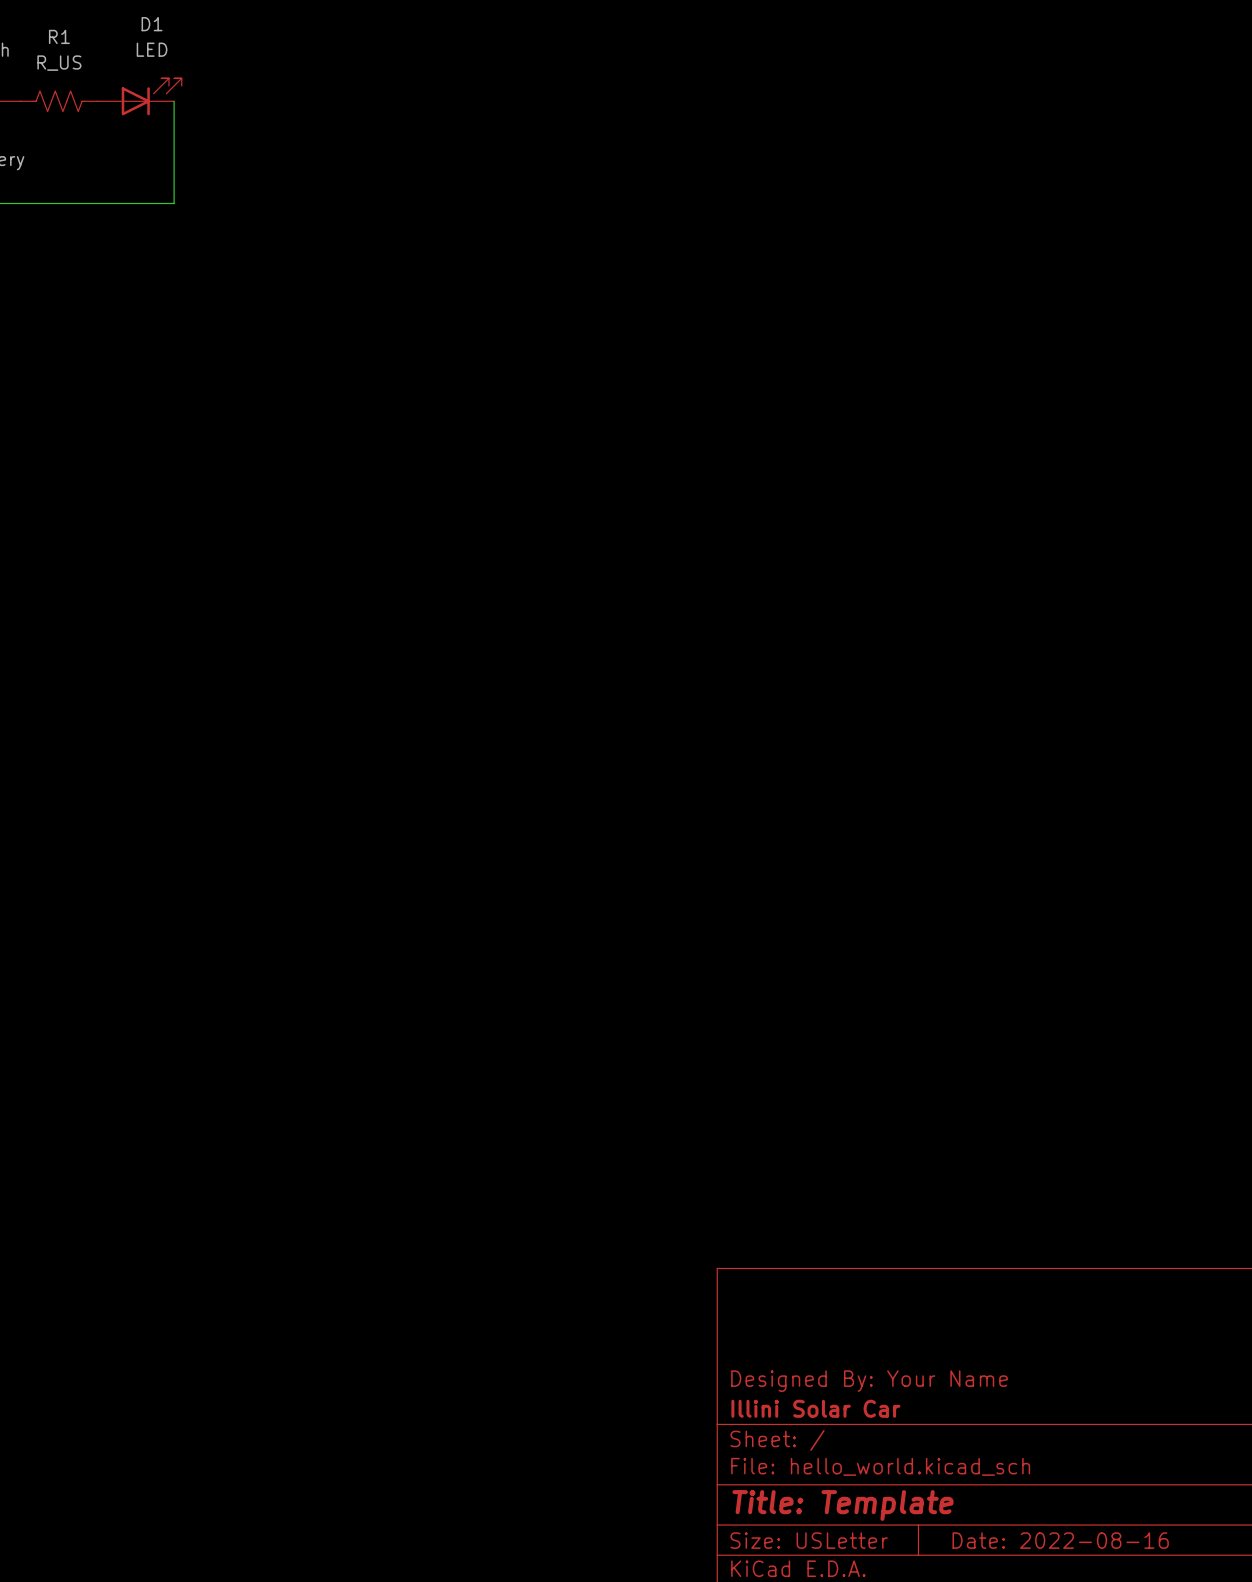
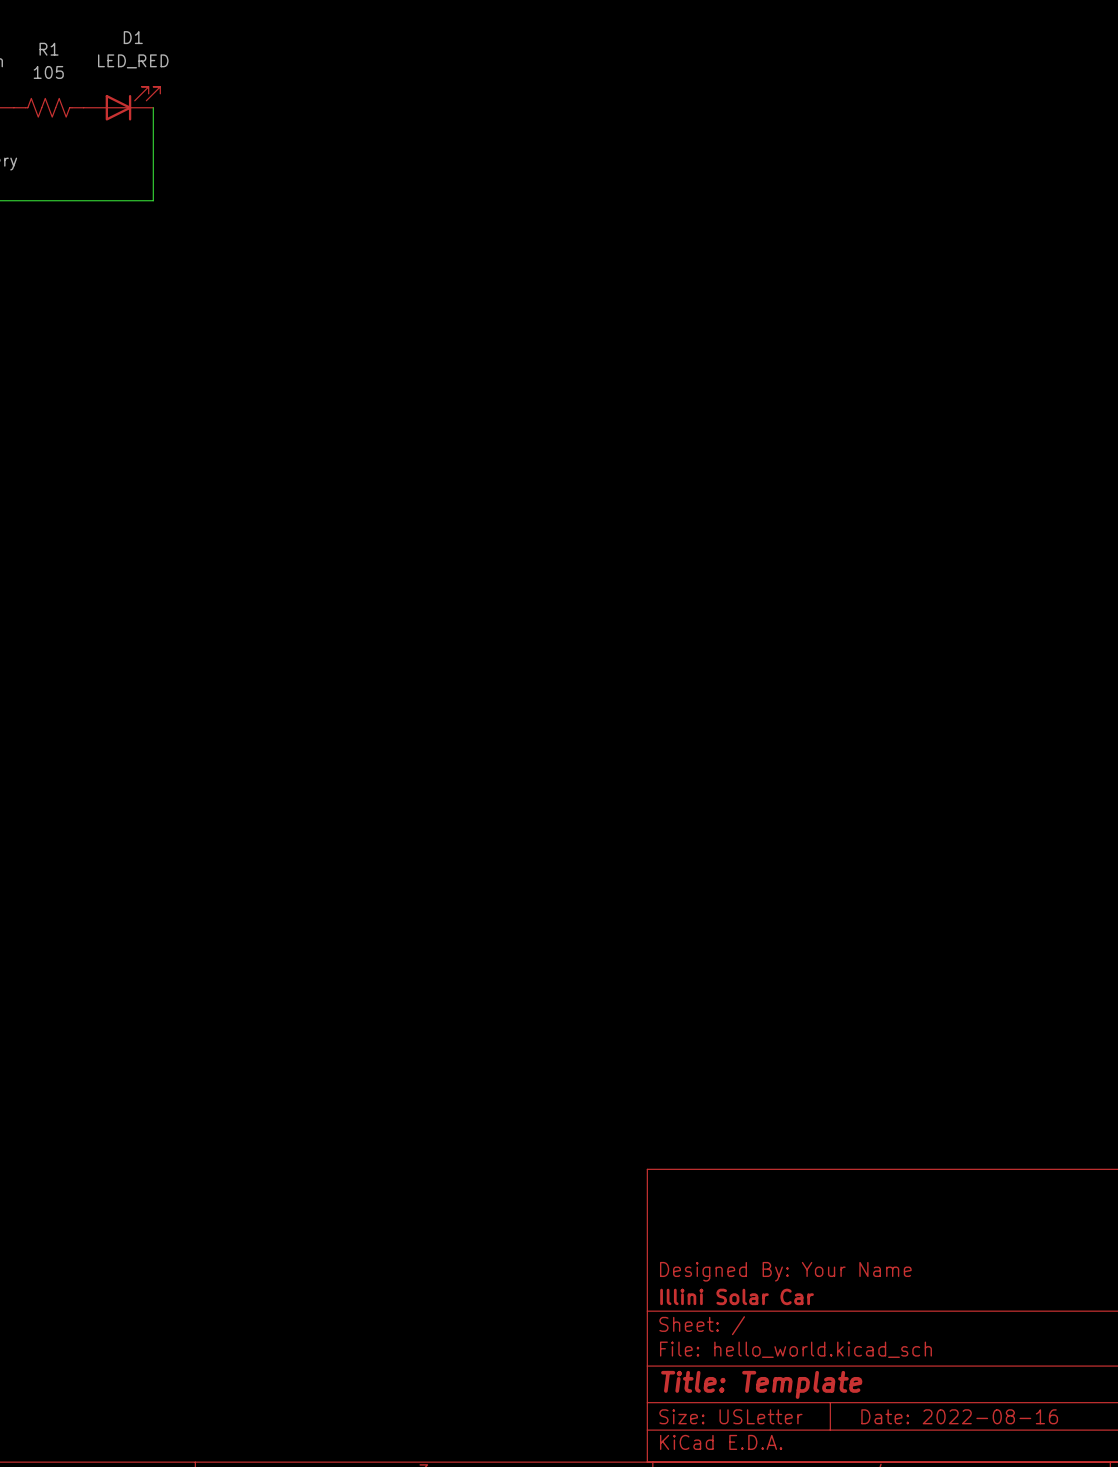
D1 value: LED (152, 49) -> LED_RED (133, 61)
R1 value: R_US (59, 63) -> 105 (48, 72)

